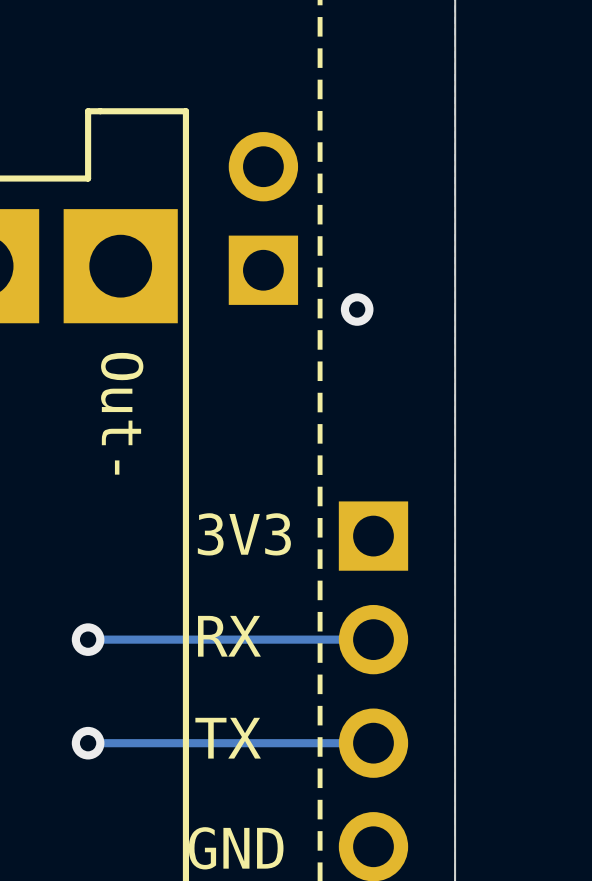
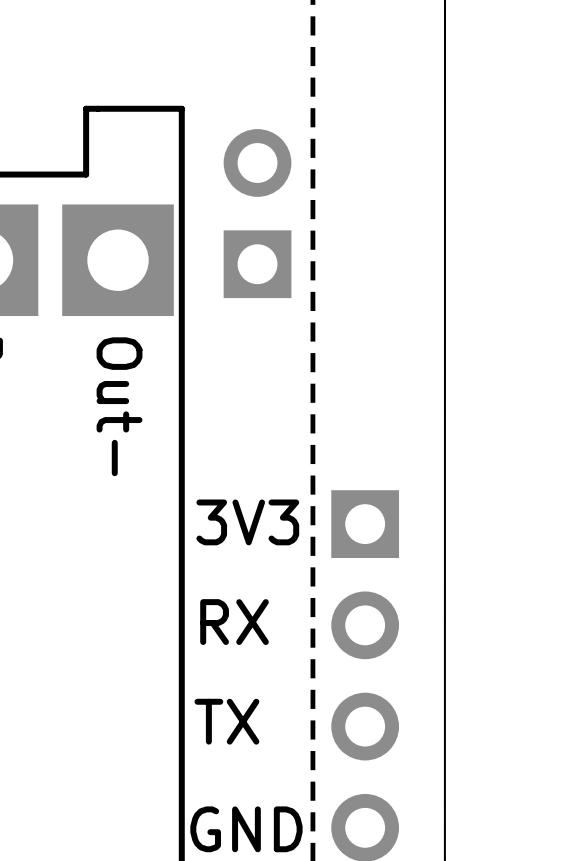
via: (357, 309) -> none
via: (88, 639) -> none
track: (373, 639) (88, 639) -> none
via: (88, 743) -> none
track: (373, 743) (88, 743) -> none

